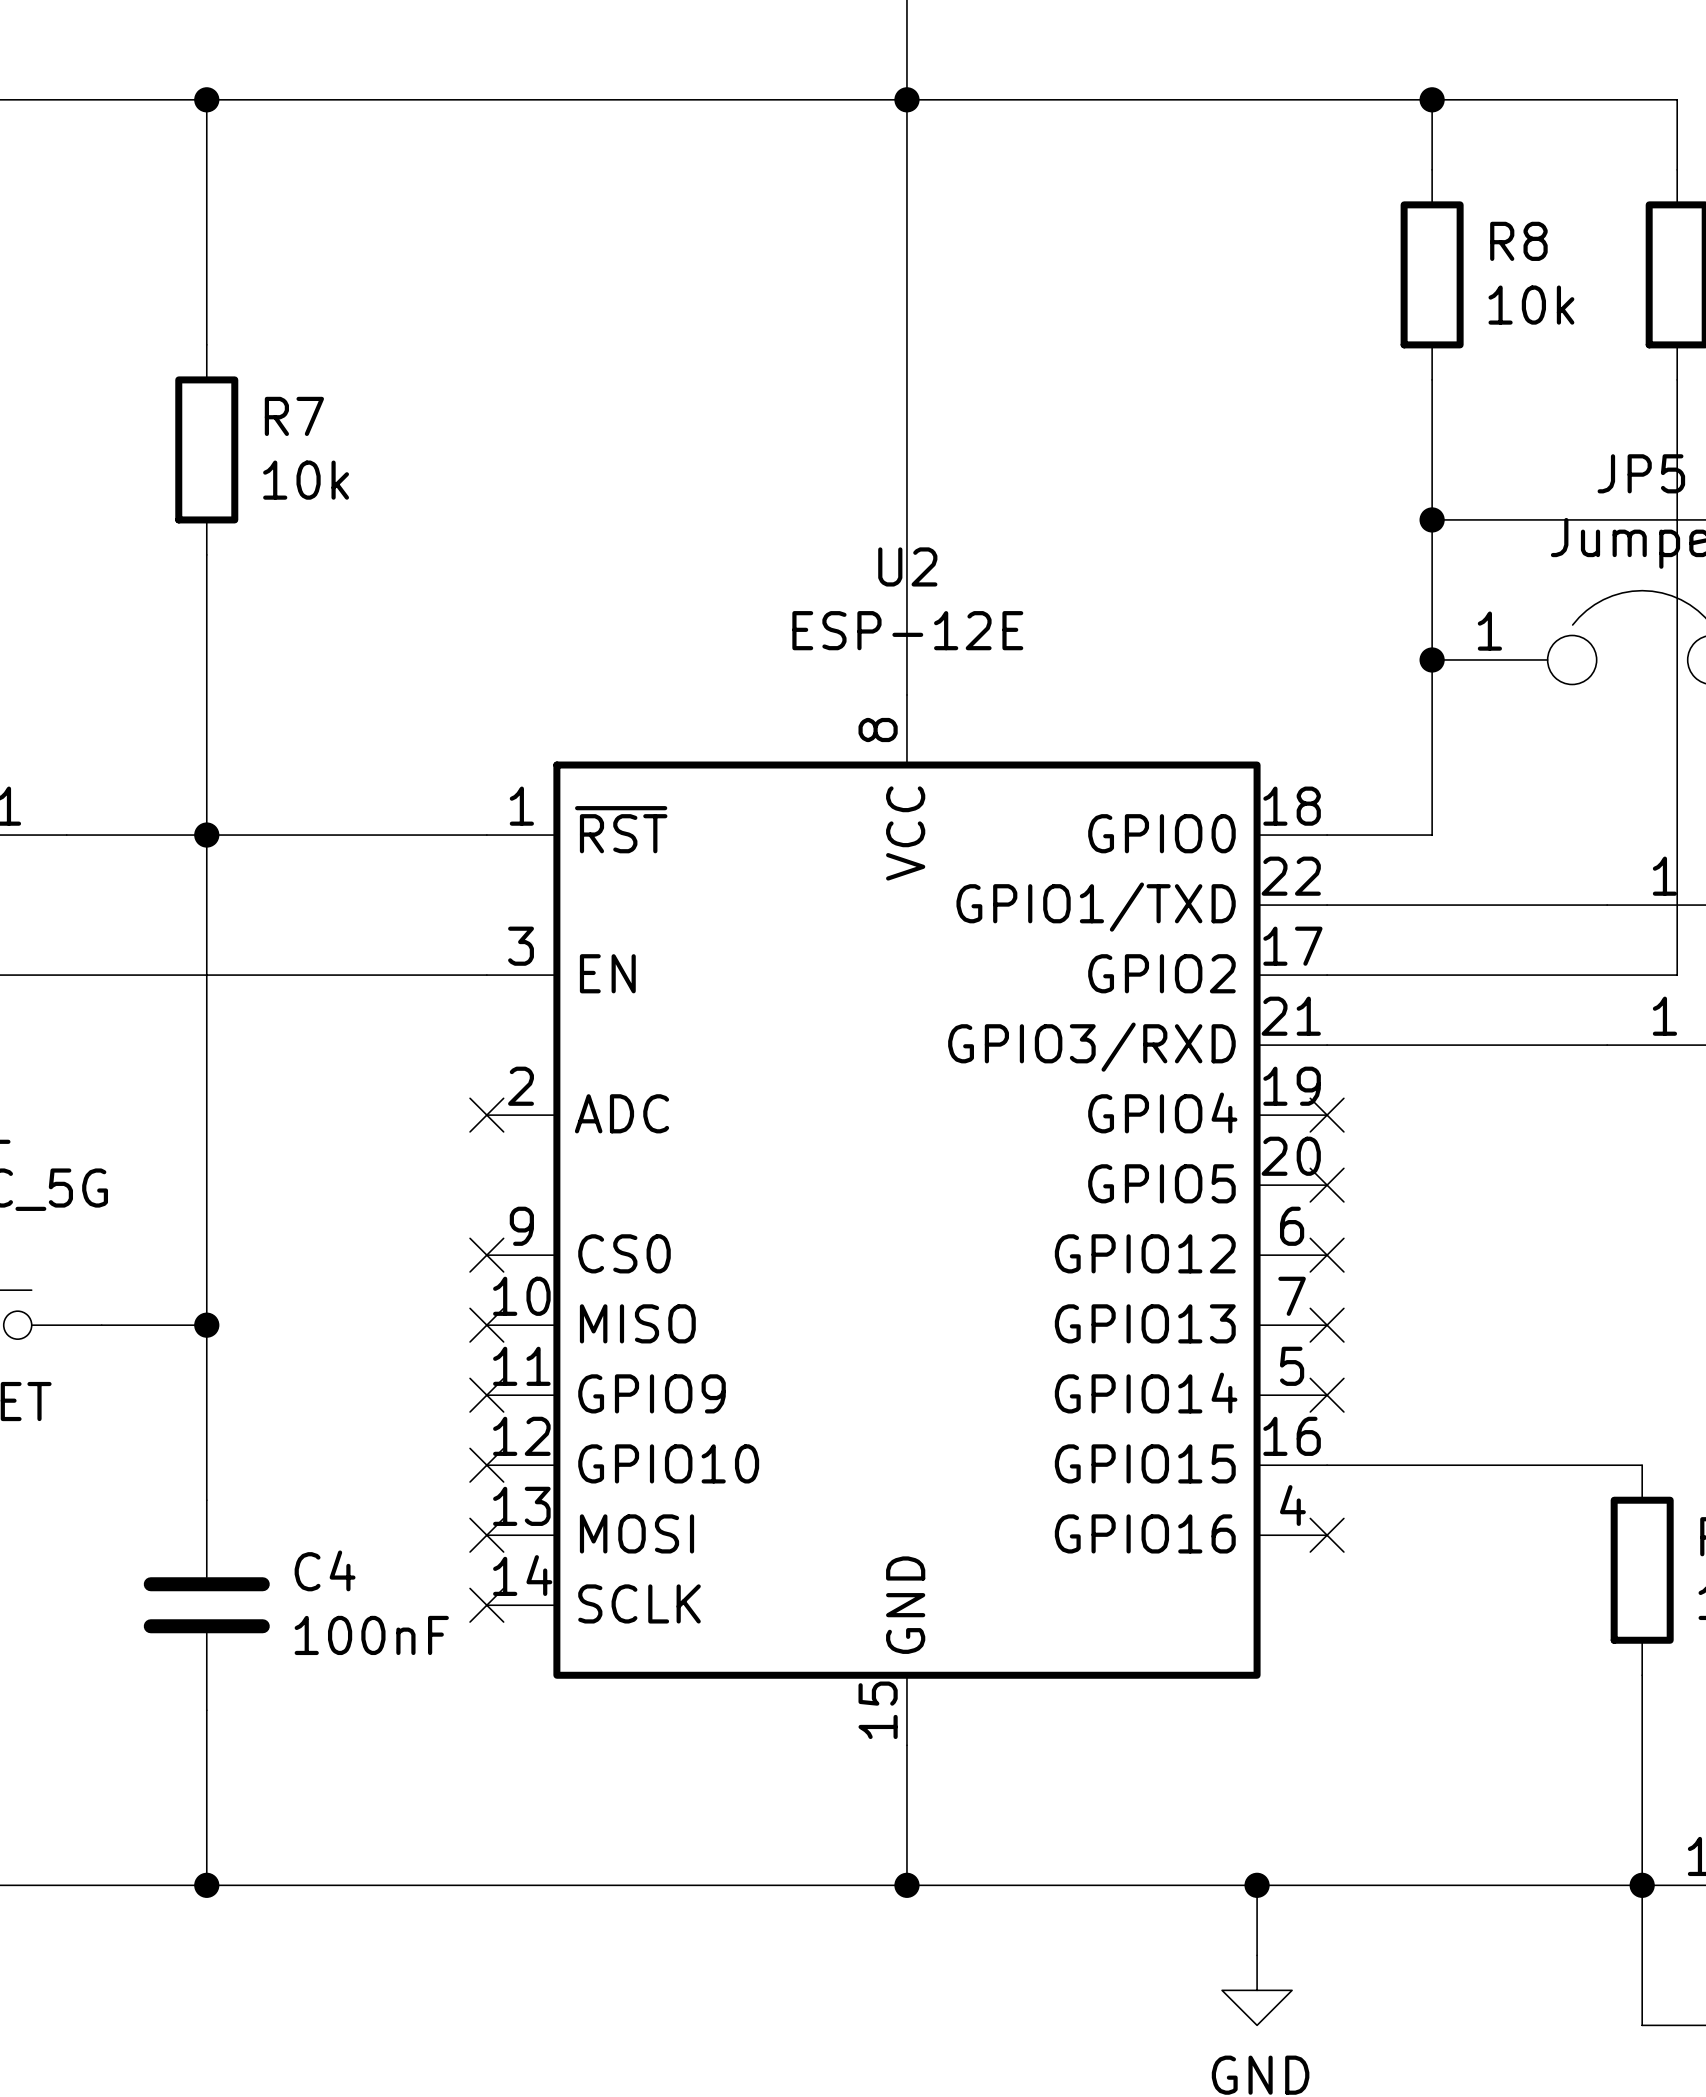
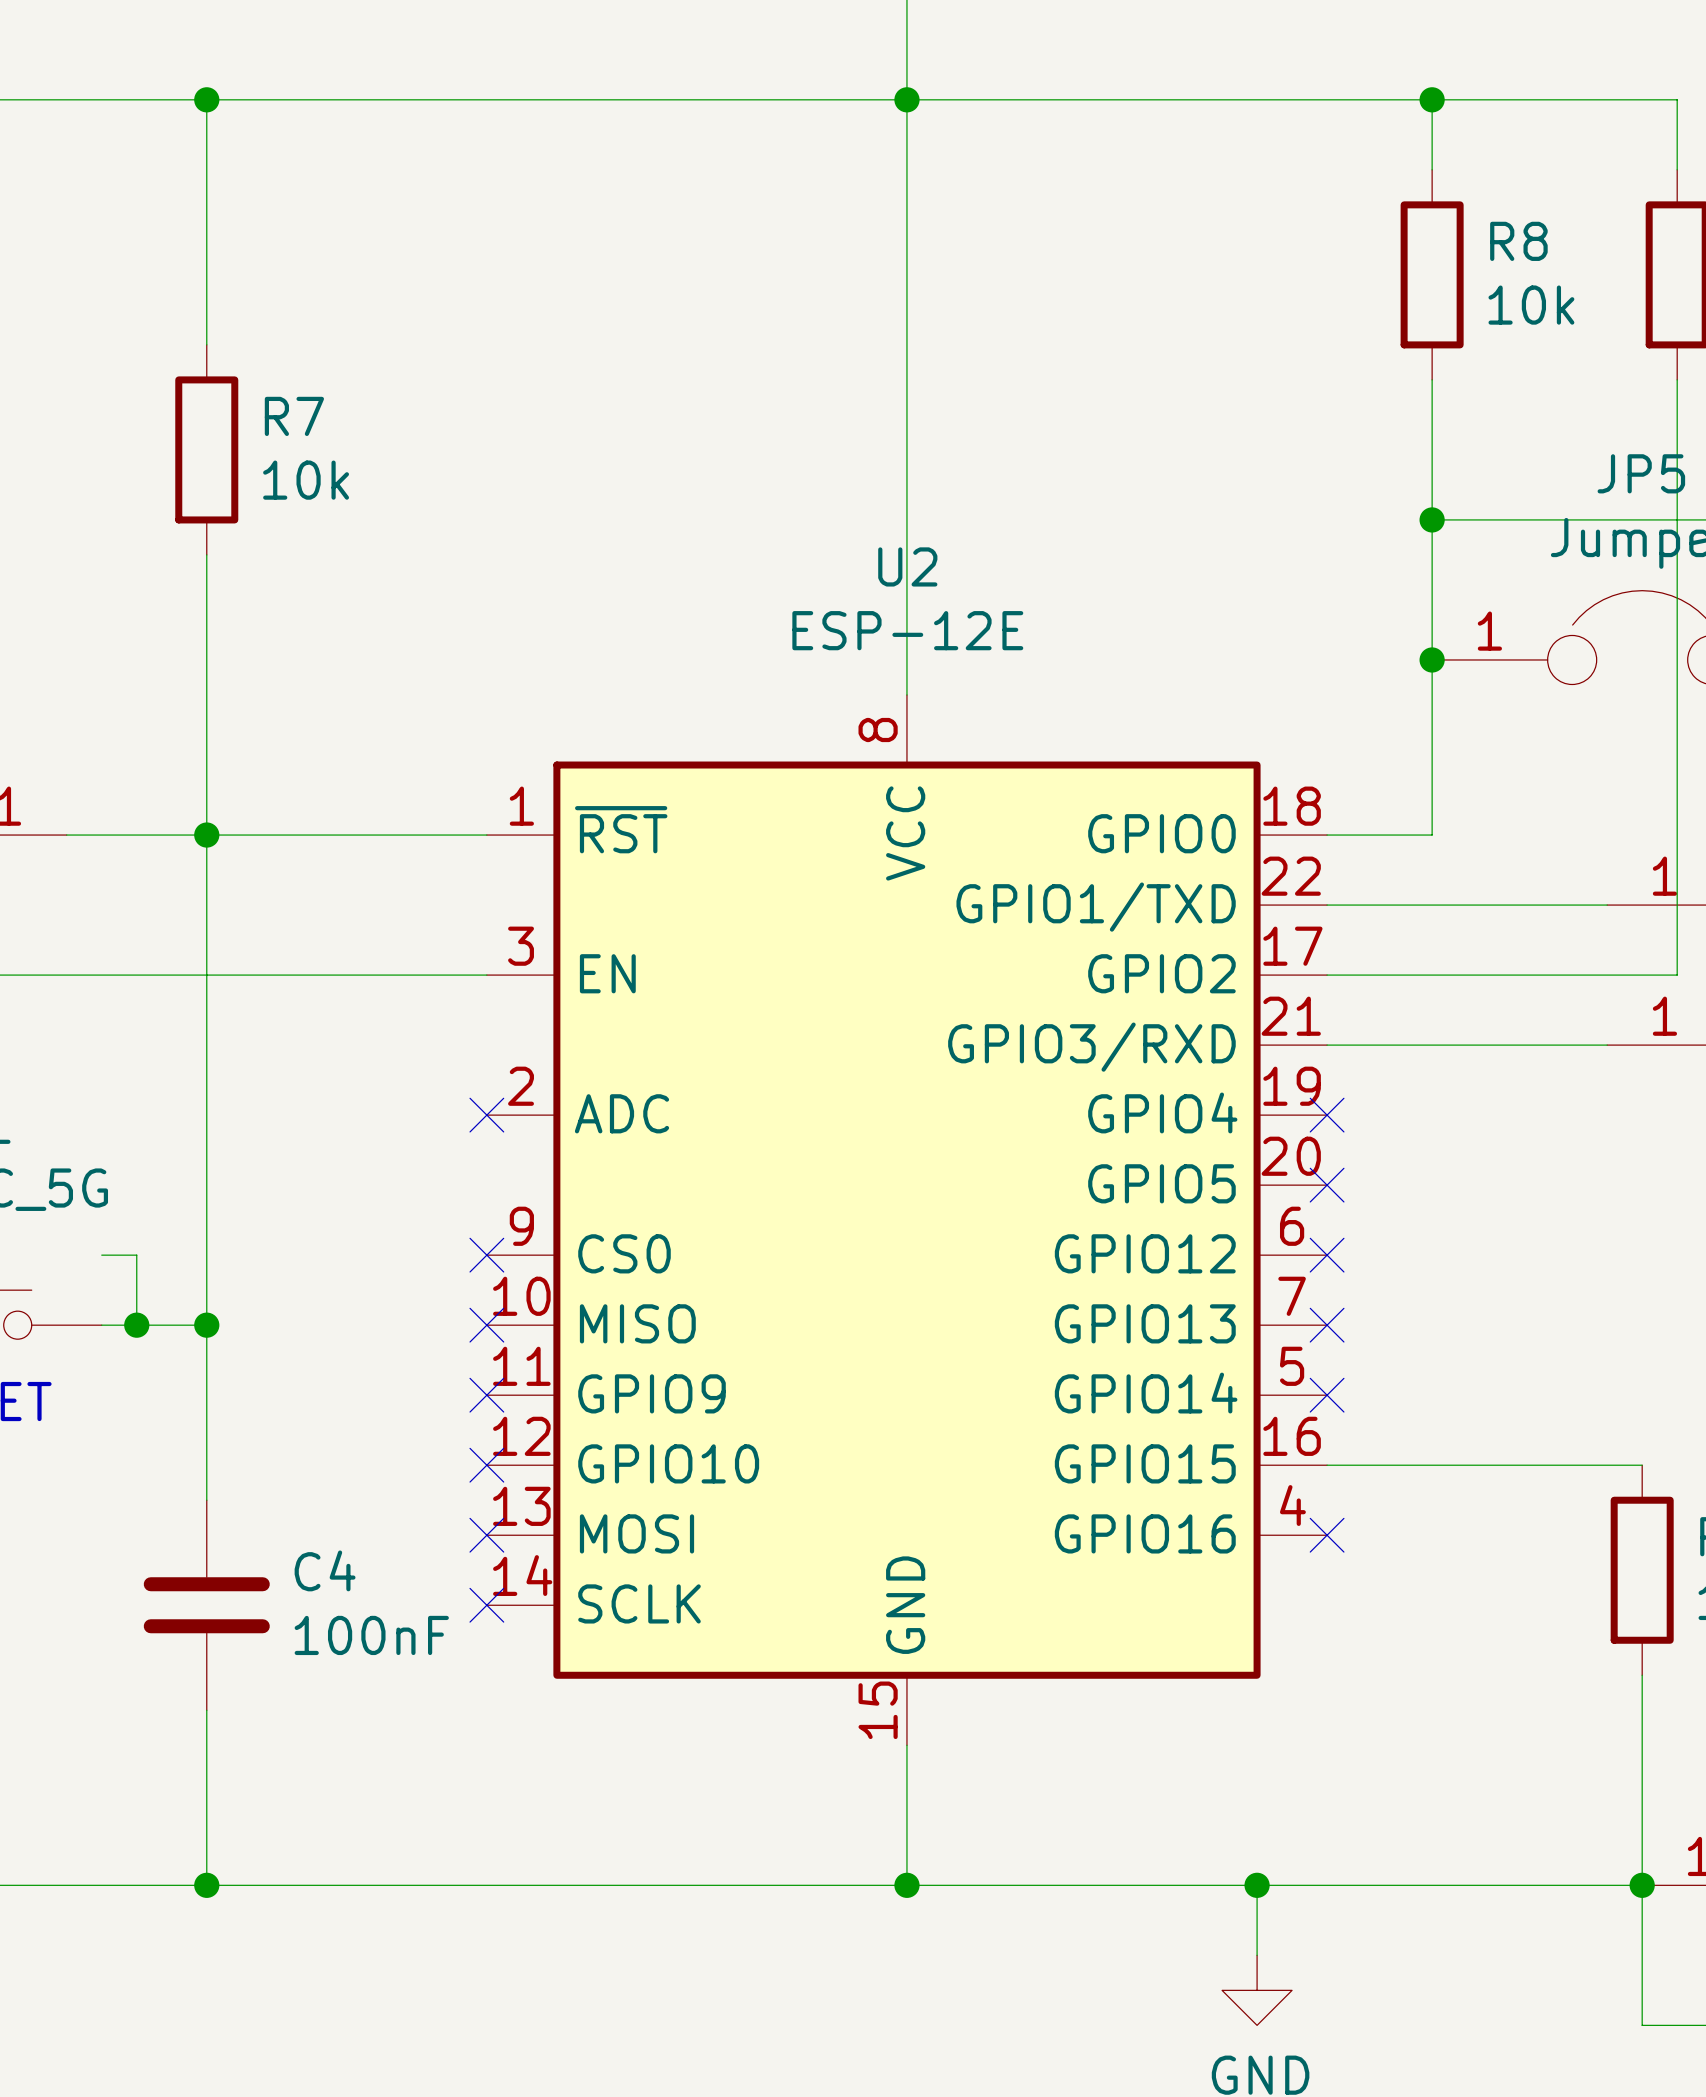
wire: none -> (101, 1255) (136, 1255) (136, 1325)
junction: none -> (136, 1325)

